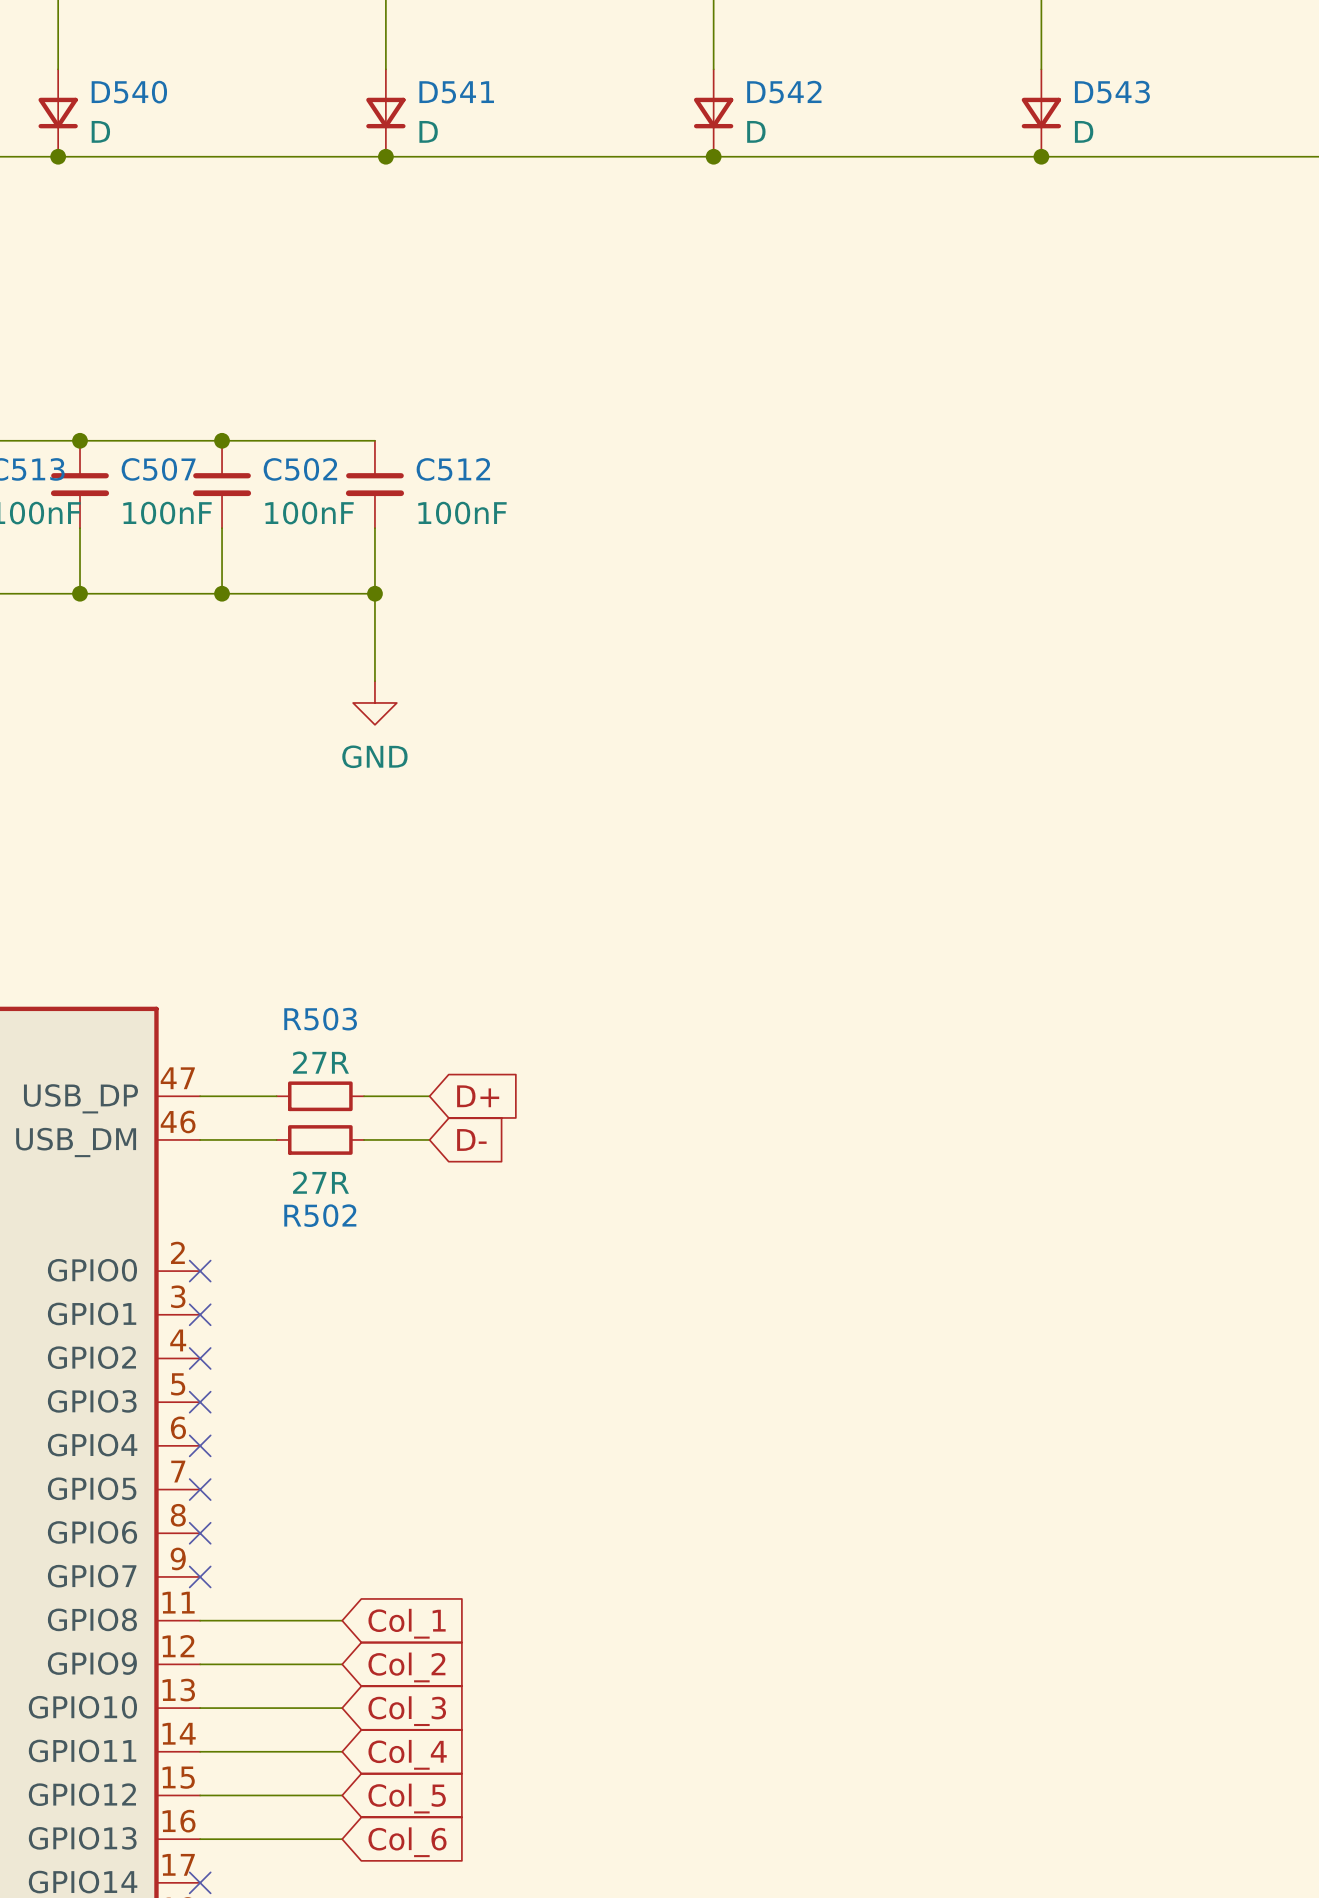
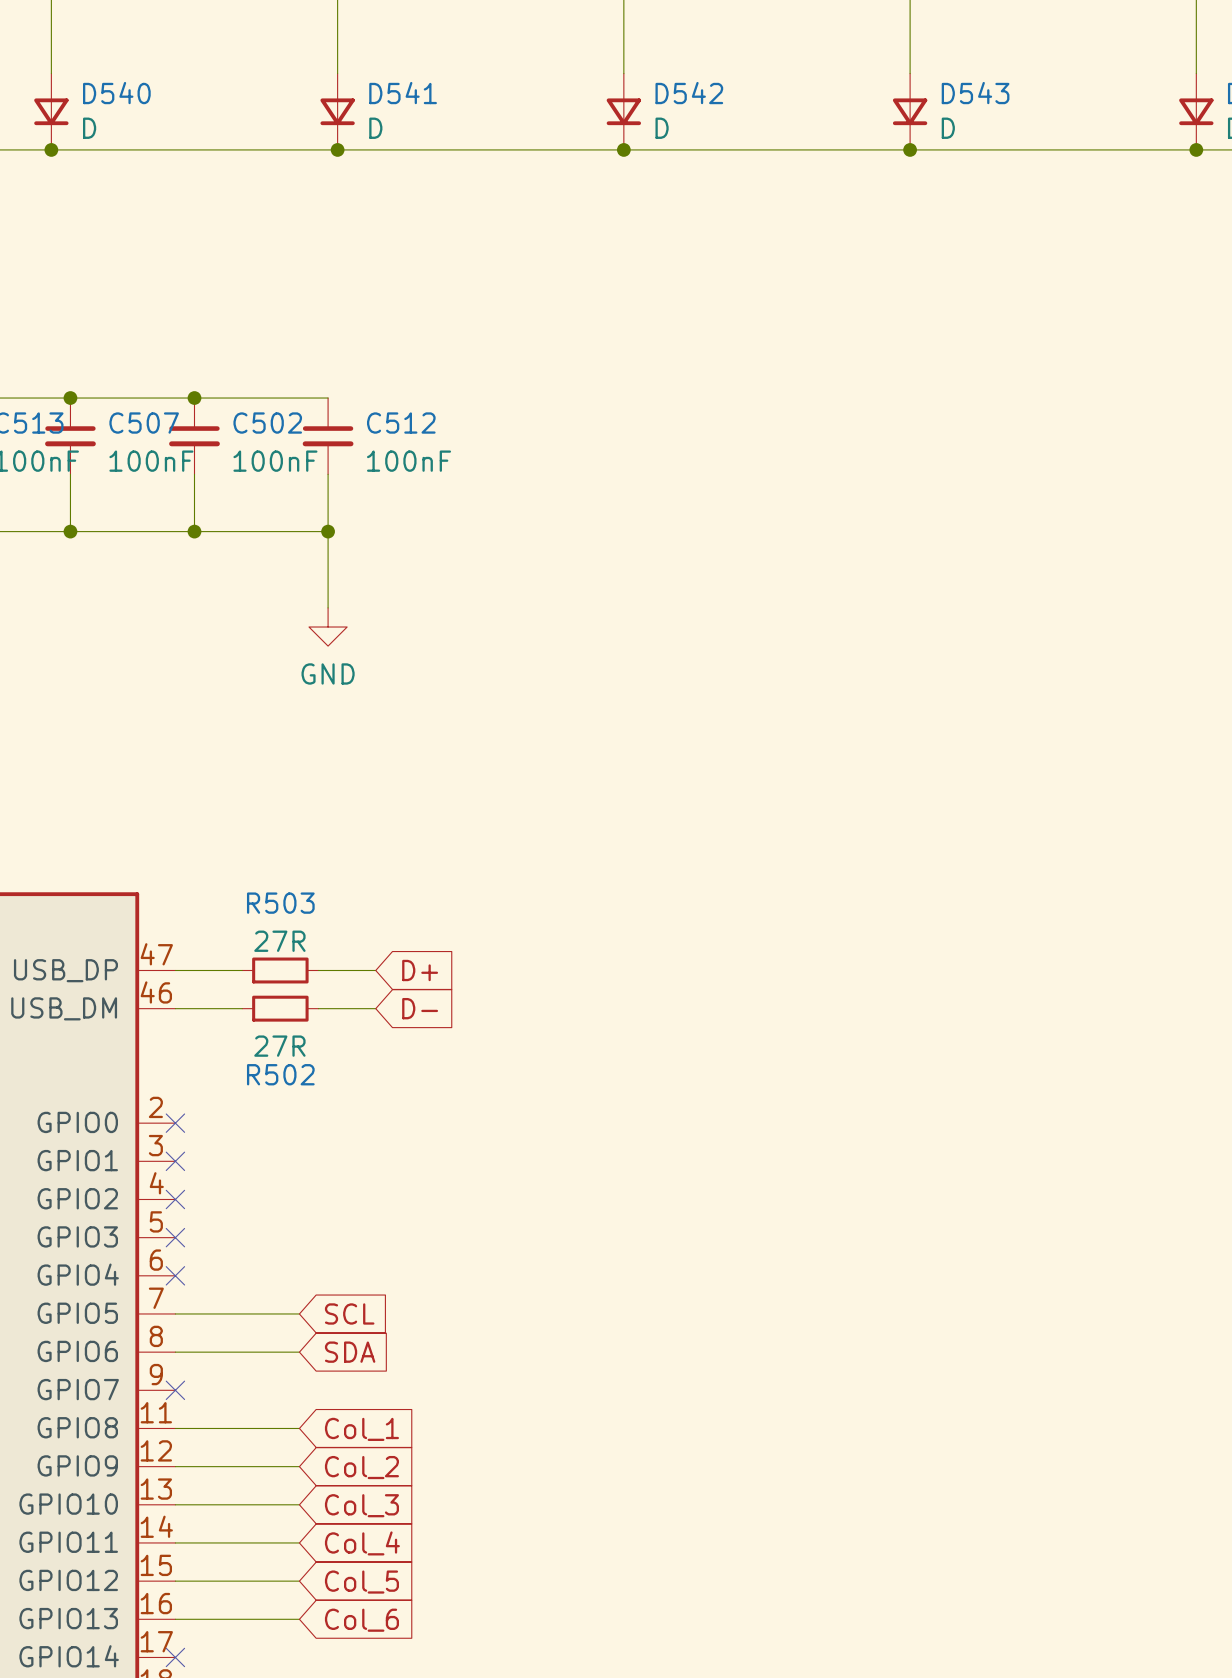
wire: none -> (175, 1313) (299, 1313)
no-connect mark: (200, 1489) -> none
global label: none -> SCL (349, 1313)
wire: none -> (175, 1352) (299, 1352)
no-connect mark: (200, 1533) -> none
global label: none -> SDA (350, 1352)

